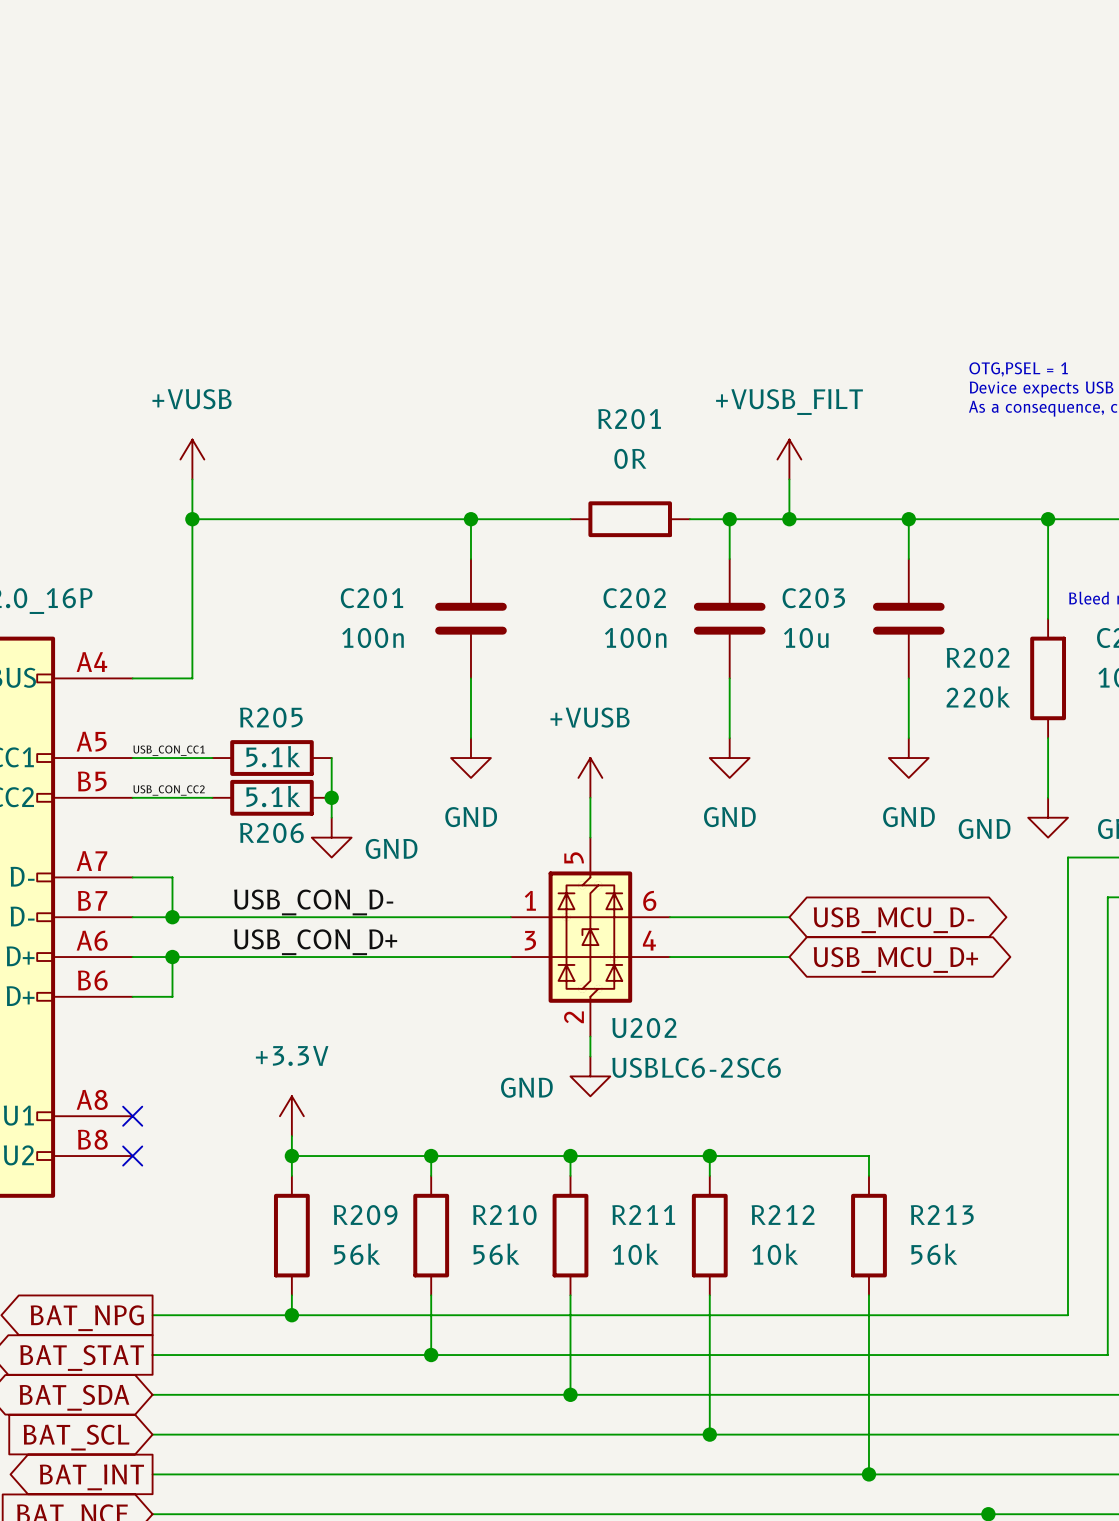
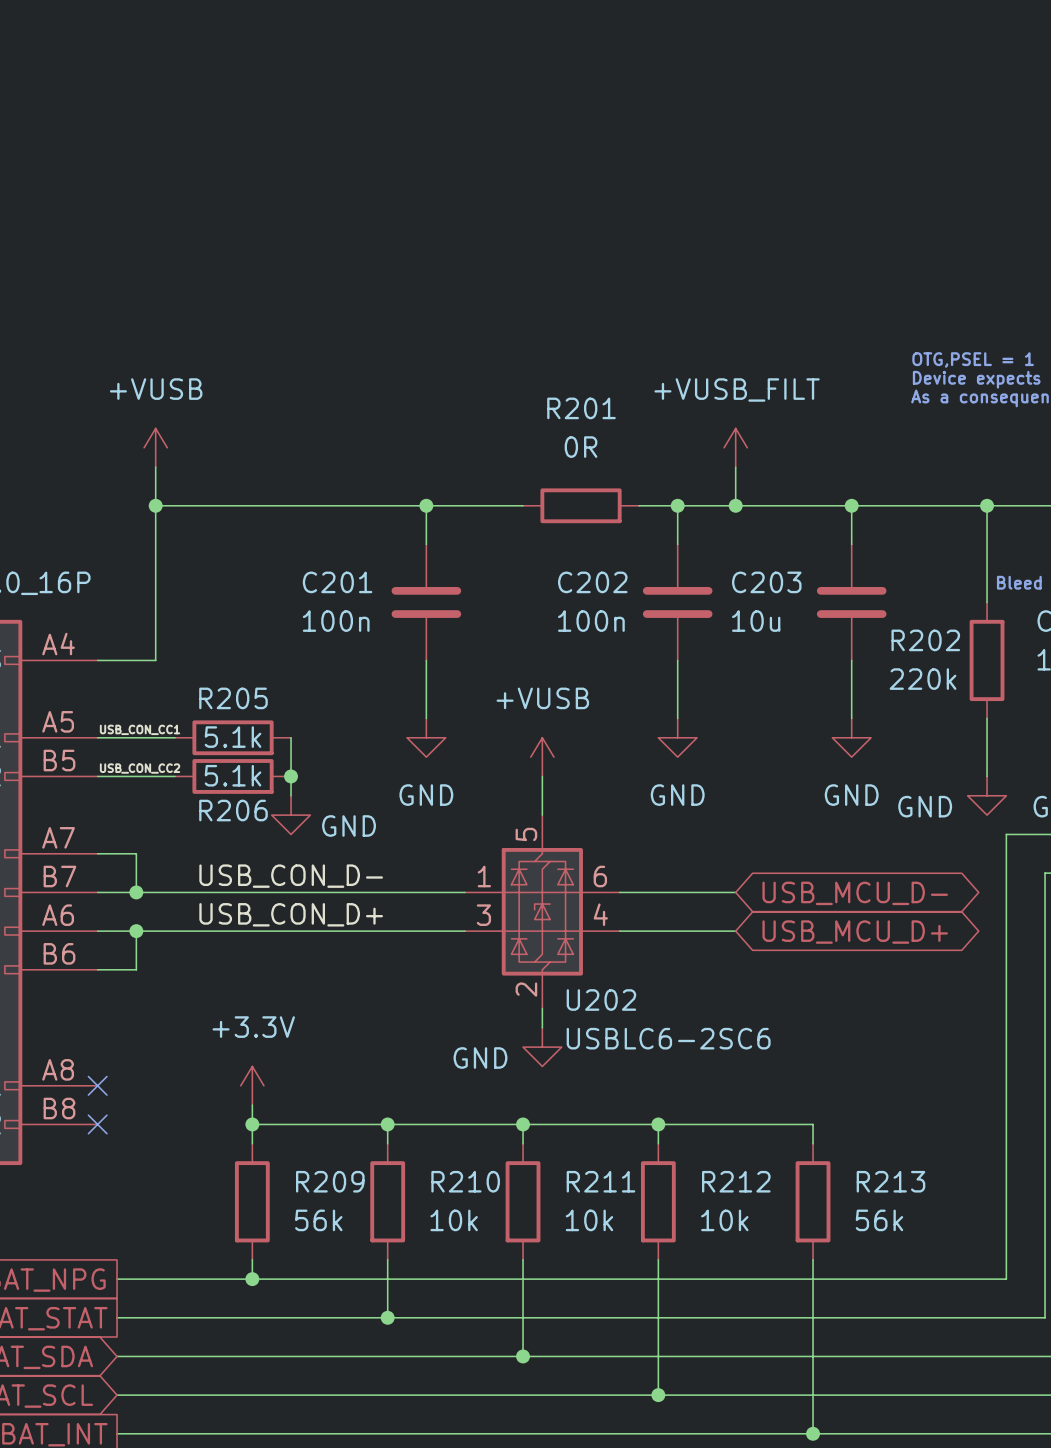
R210 value: 56k (496, 1254) -> 10k (454, 1220)

